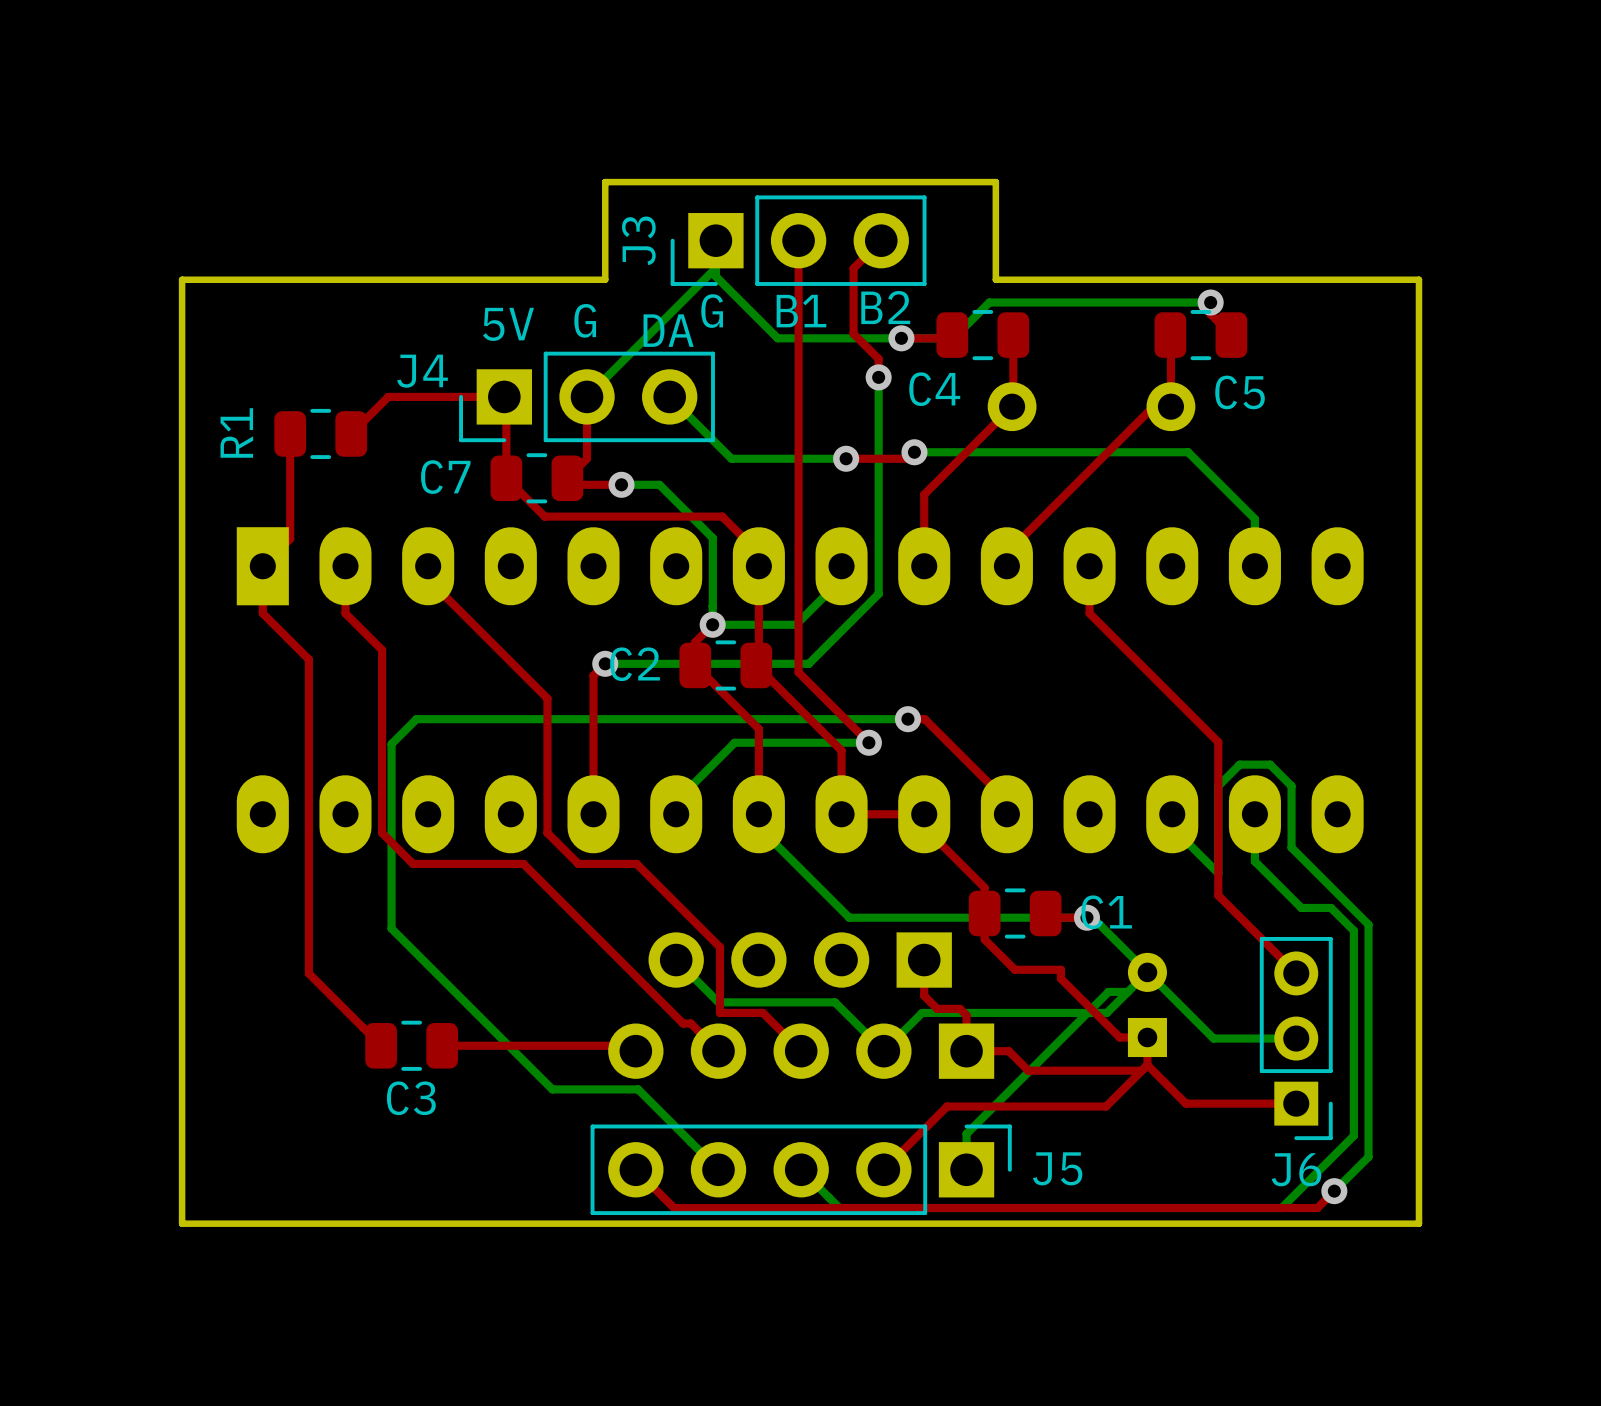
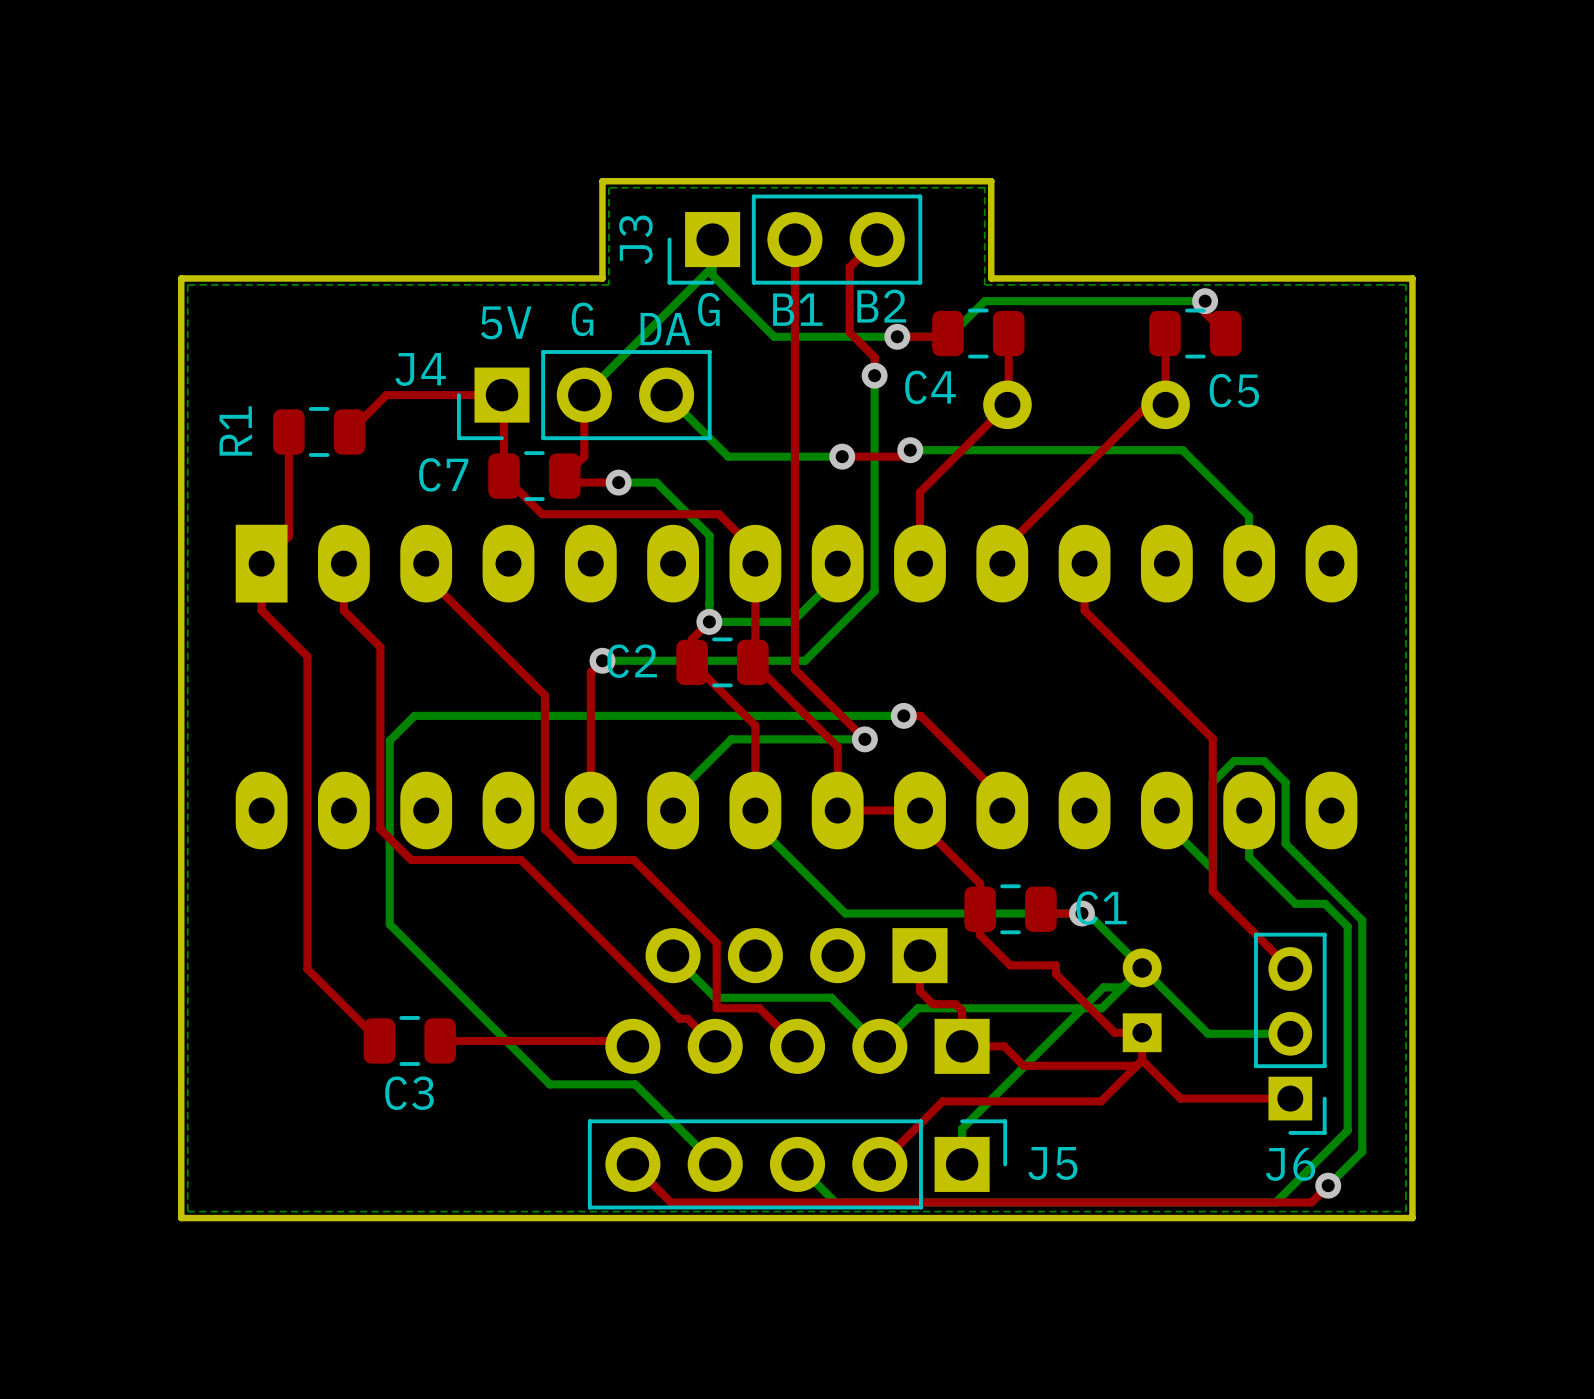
bottom zone outline: none -> (608, 187) (984, 187) (984, 284) (1405, 284) (1405, 1211) (187, 1211) (187, 284) (608, 284) (608, 187)

